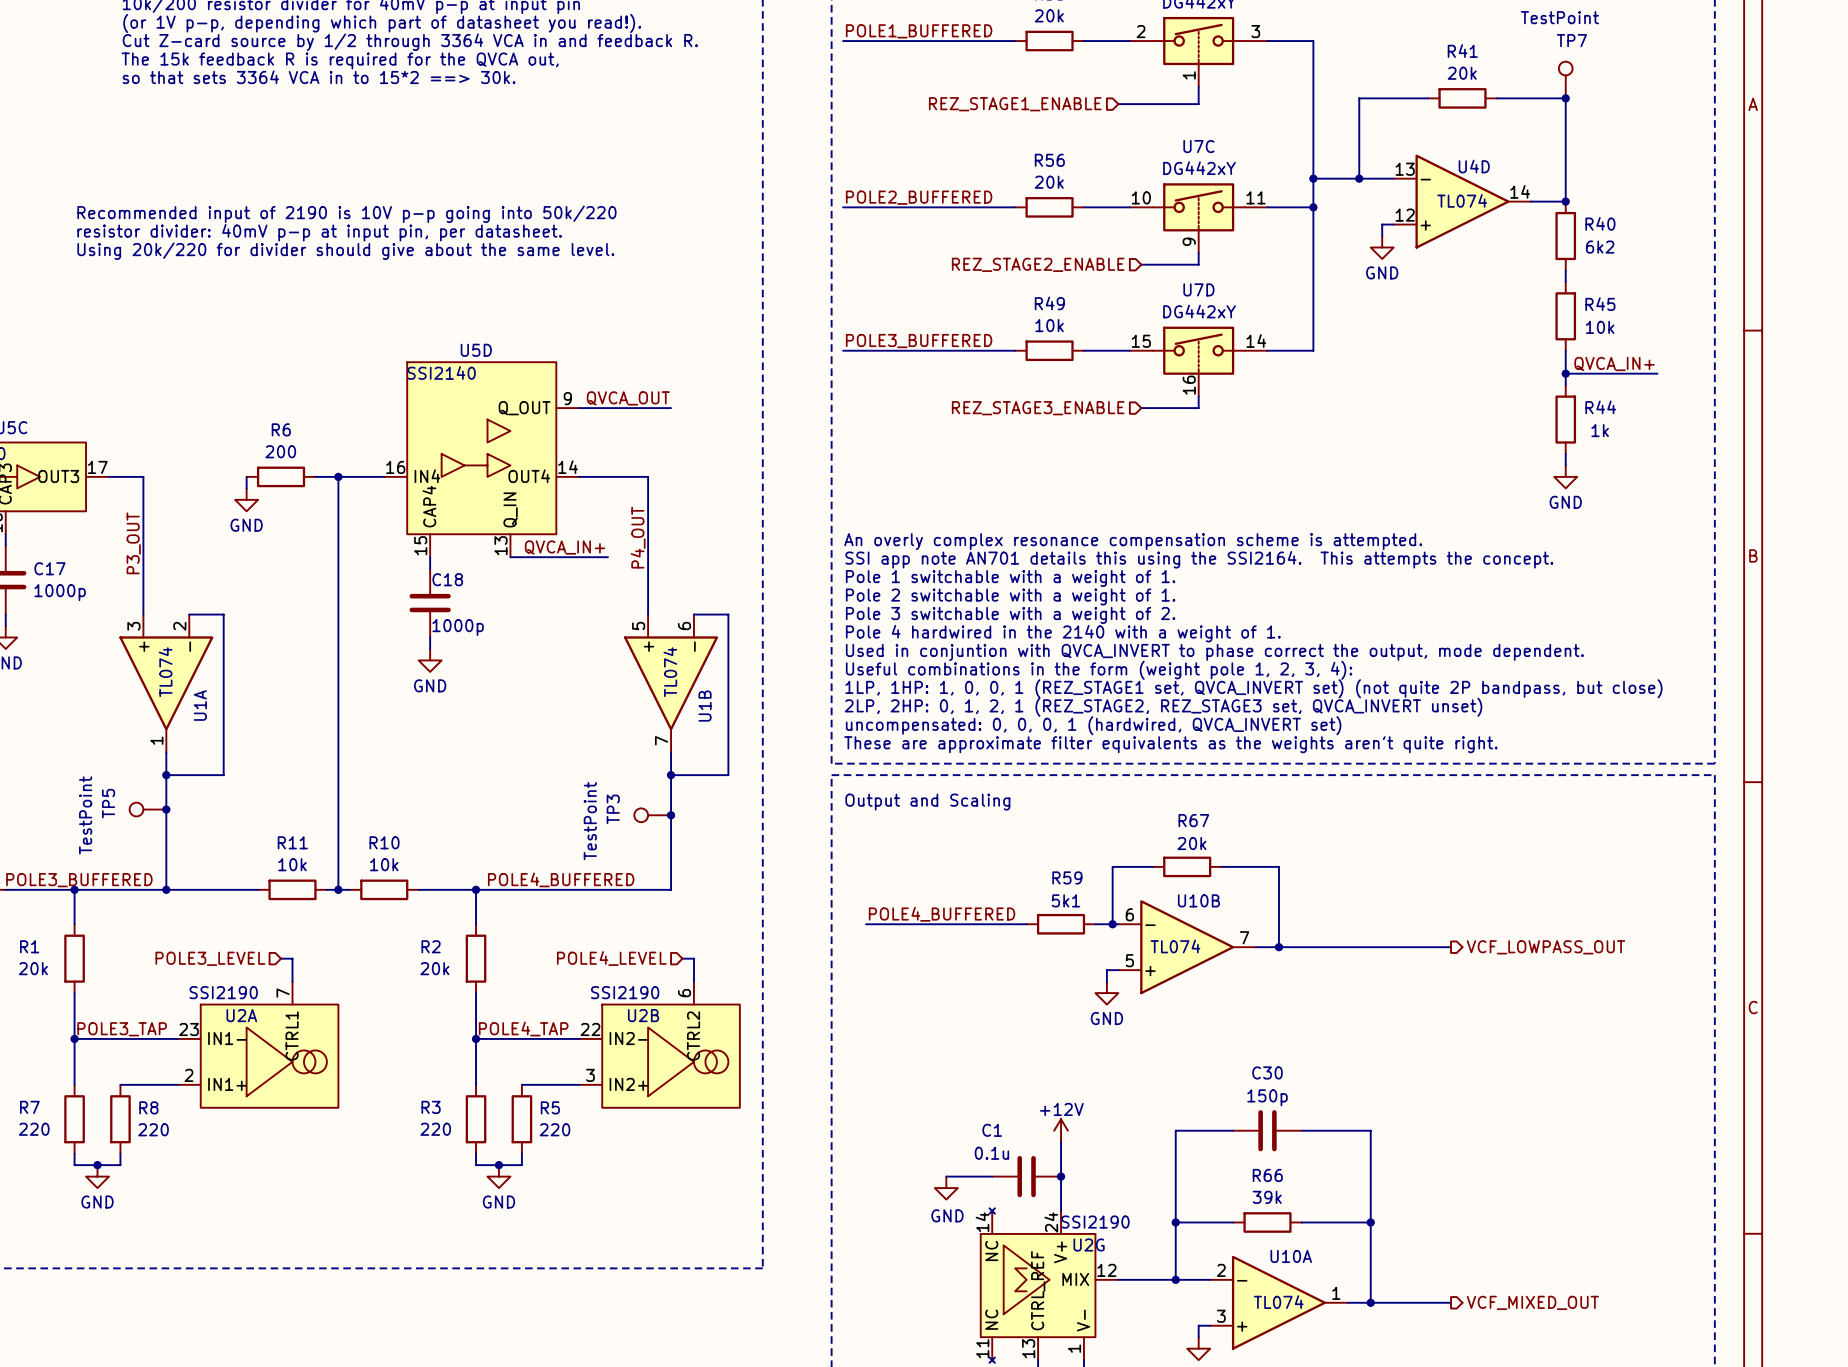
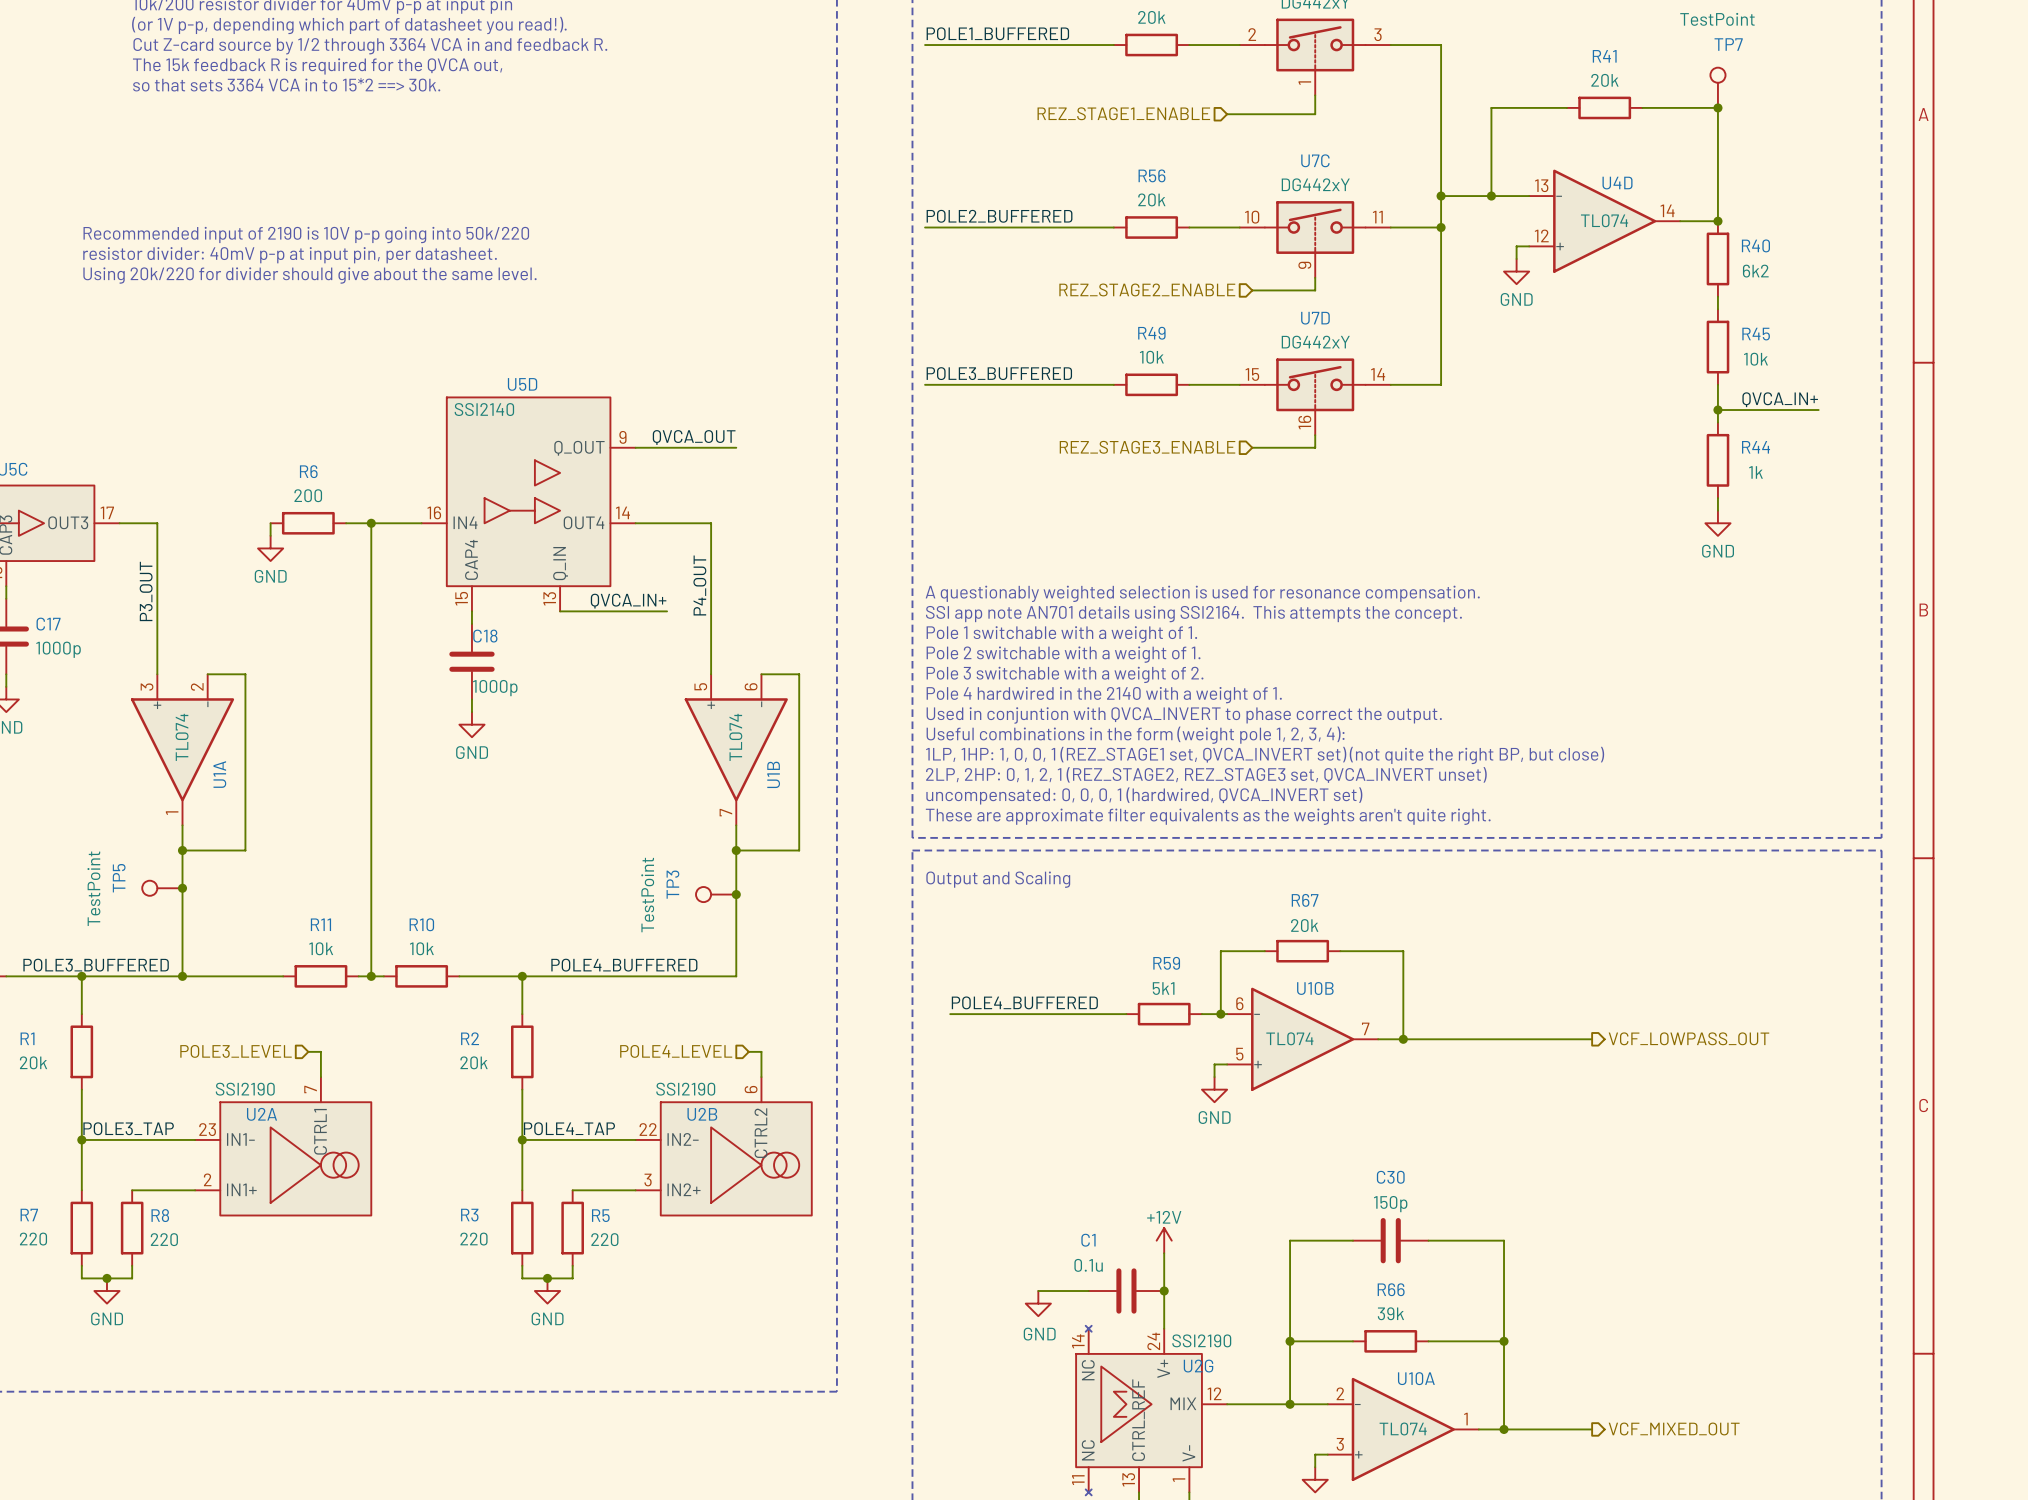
text: An overly complex resonance compensation scheme is attempted. (1133, 541) -> A questionably weighted selection is used for resonance compensation. (1202, 593)
text: SSI app note AN701 details this using the SSI2164. This attempts the concept. (1199, 559) -> SSI app note AN701 details using SSI2164. This attempts the concept. (1193, 614)
text: Used in conjuntion with QVCA_INVERT to phase correct the output, mode dependent. (1214, 652) -> Used in conjuntion with QVCA_INVERT to phase correct the output. (1184, 715)
text: 1LP, 1HP: 1, 0, 0, 1 (REZ_STAGE1 set, QVCA_INVERT set) (not quite 2P bandpass, but close) (1253, 688) -> 1LP, 1HP: 1, 0, 0, 1 (REZ_STAGE1 set, QVCA_INVERT set) (not quite the right BP, but close) (1265, 755)

